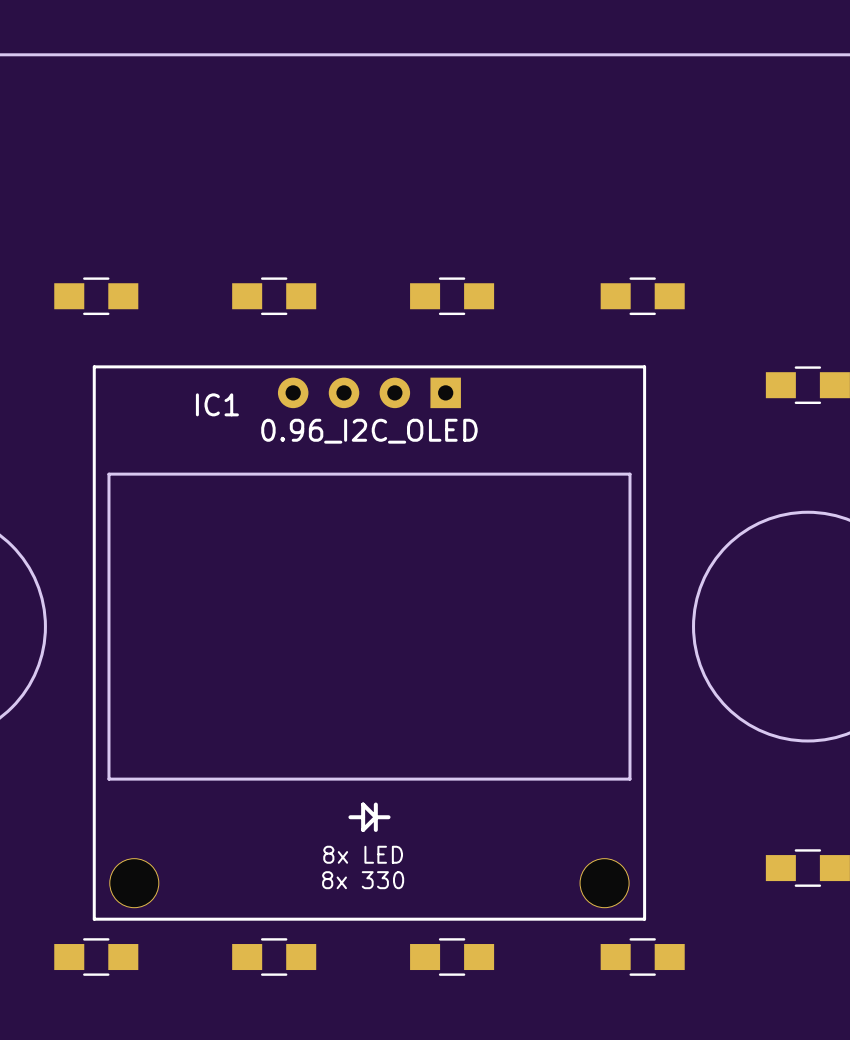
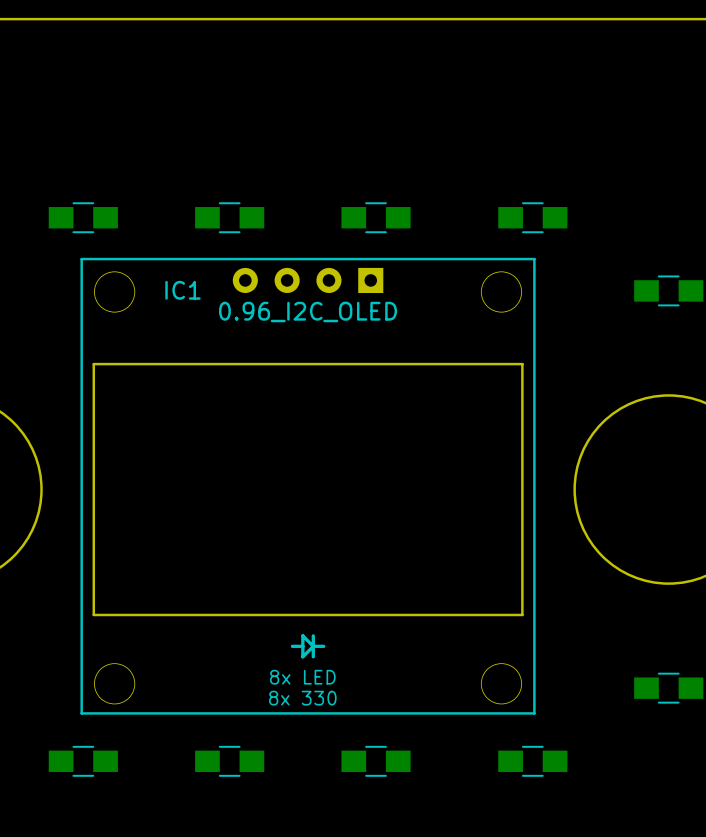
IC1 footprint: [92, 365, 647, 921] -> [80, 257, 536, 715]

